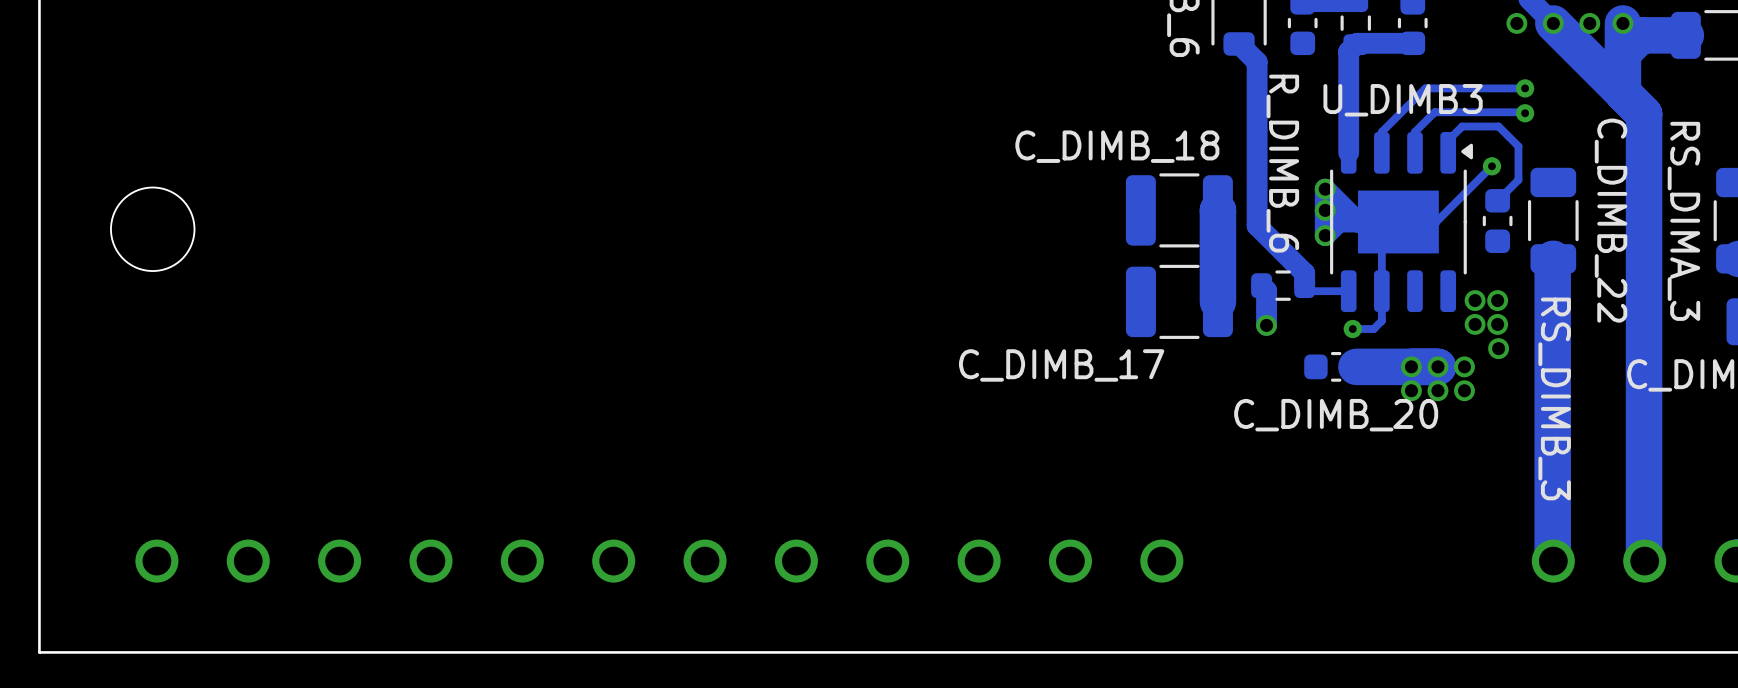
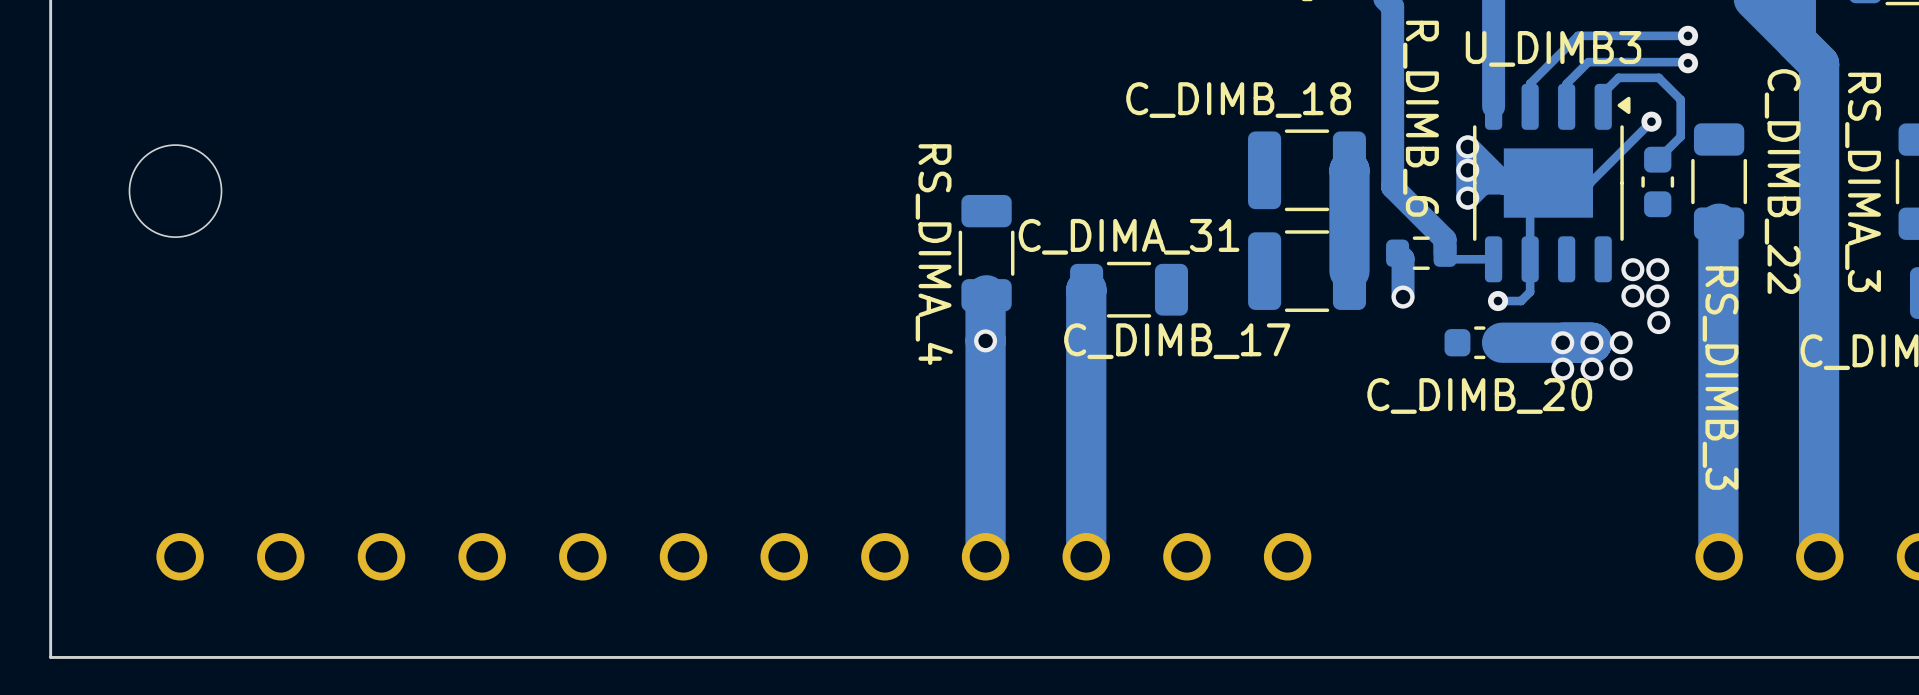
RS_DIMA_4: none -> (986, 253)
C_DIMA_31: none -> (1129, 289)
track: none -> (1086, 290) (1086, 556)
track: none -> (986, 295) (985, 556)
via: none -> (985, 340)

